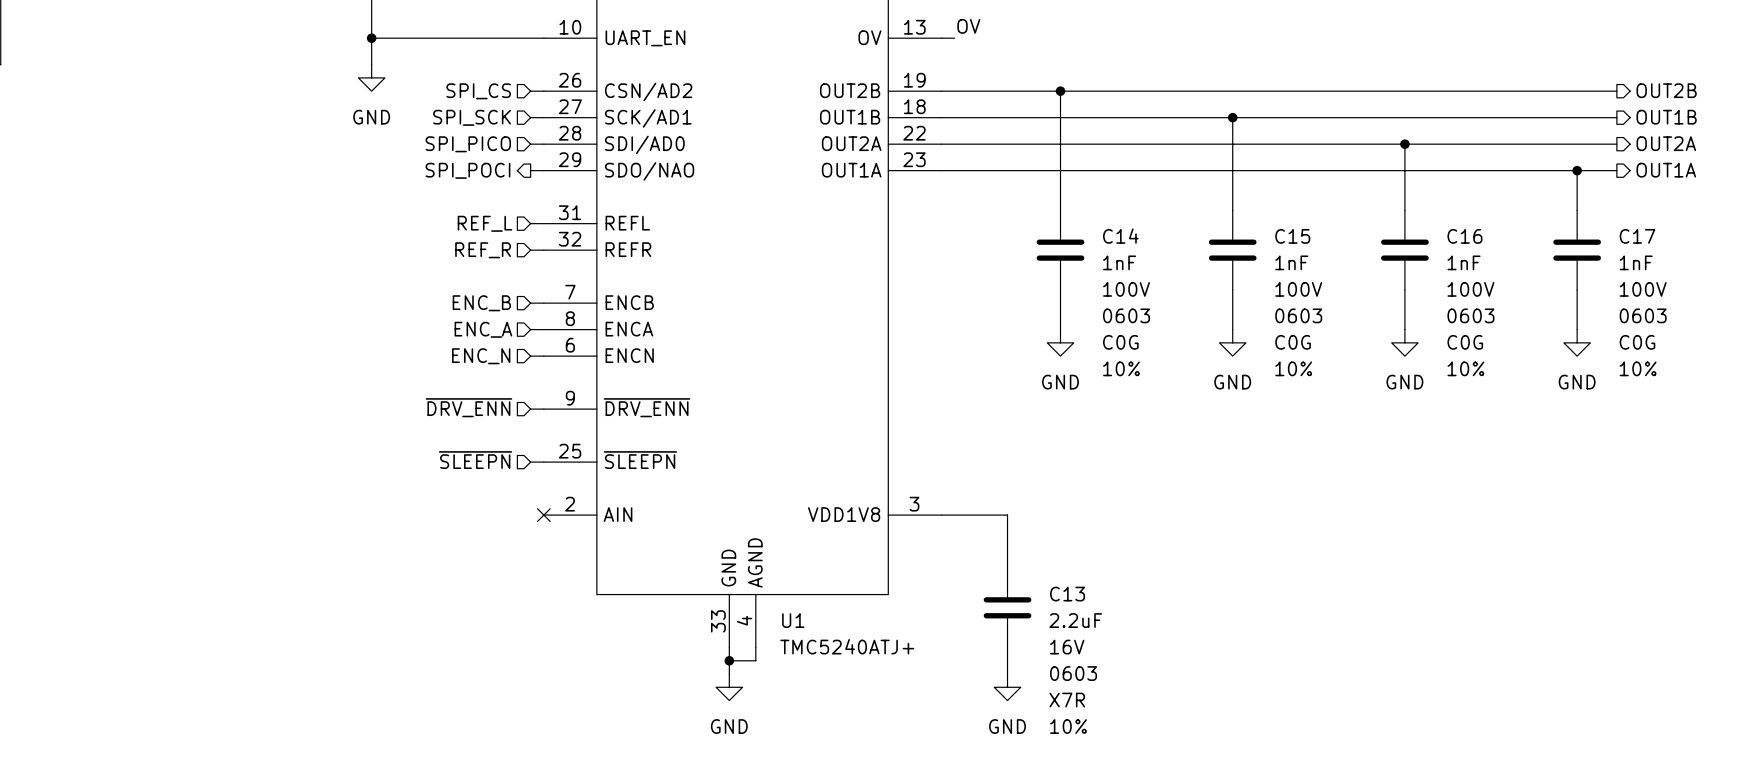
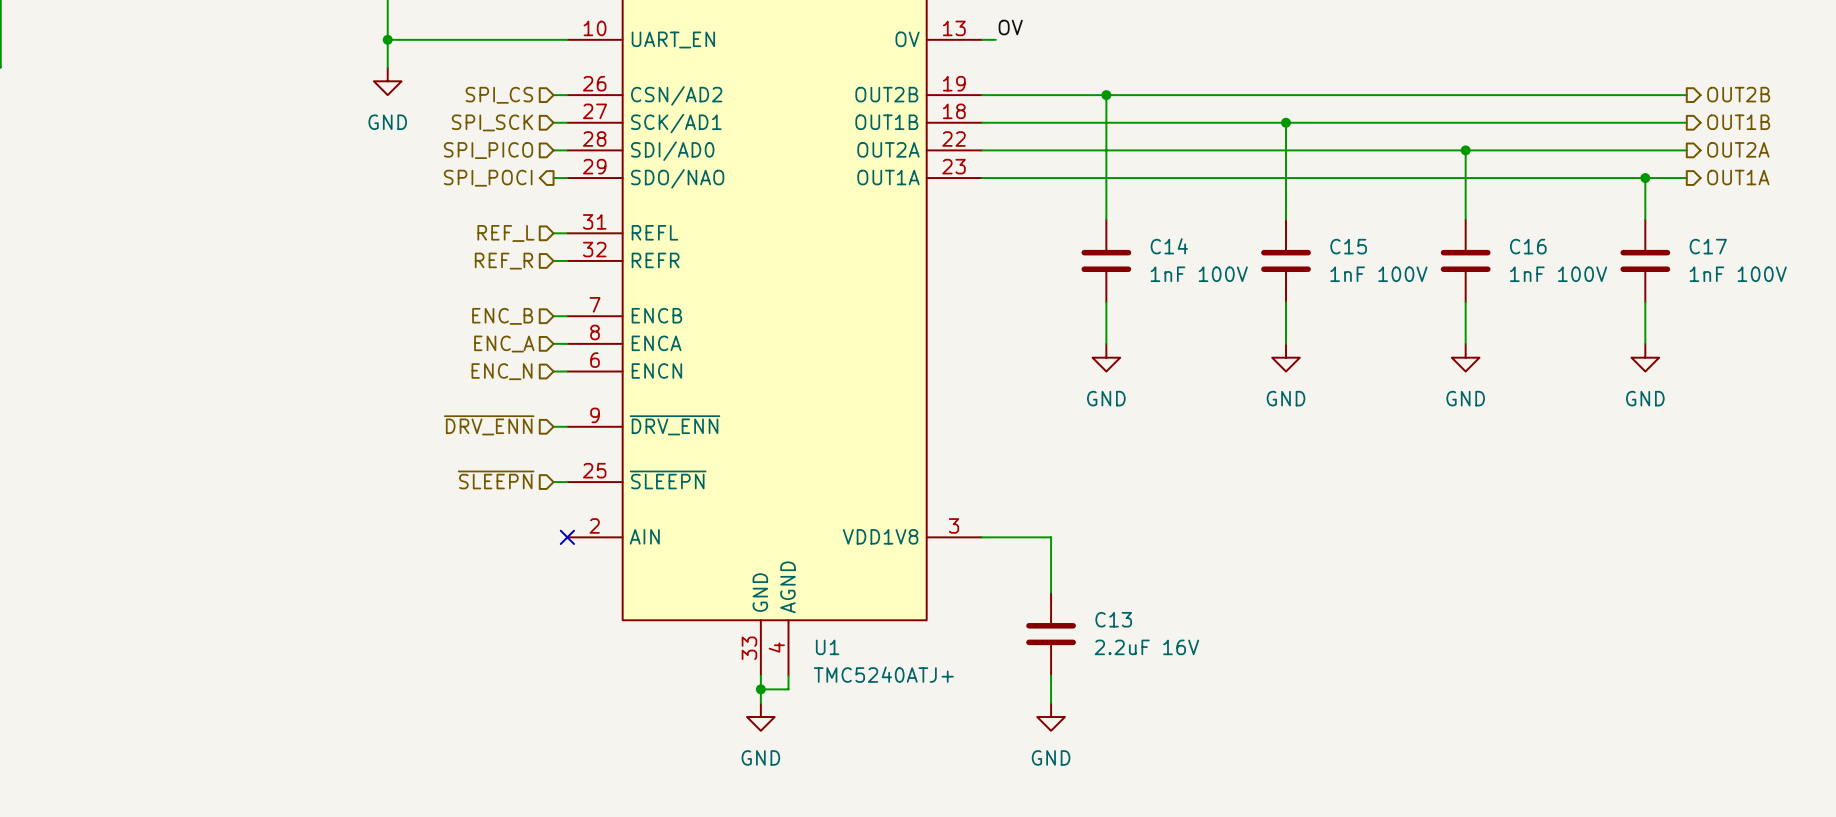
C14 value: 1nF (1119, 262) -> 1nF 100V (1199, 274)
C15 value: 1nF (1291, 262) -> 1nF 100V (1378, 274)
C16 value: 1nF (1464, 262) -> 1nF 100V (1558, 274)
C17 value: 1nF (1636, 262) -> 1nF 100V (1738, 274)
C14 text: 100V (1126, 289) -> none
C15 text: 100V (1298, 289) -> none
C16 text: 100V (1470, 289) -> none
C17 text: 100V (1643, 289) -> none
C14 text: 0603 (1126, 315) -> none
C15 text: 0603 (1298, 315) -> none
C16 text: 0603 (1470, 315) -> none
C17 text: 0603 (1643, 315) -> none
C14 text: C0G (1120, 342) -> none
C15 text: C0G (1293, 342) -> none
C16 text: C0G (1465, 342) -> none
C17 text: C0G (1637, 342) -> none
C14 text: 10% (1121, 368) -> none
C15 text: 10% (1293, 368) -> none
C16 text: 10% (1465, 368) -> none
C17 text: 10% (1638, 368) -> none
C13 value: 2.2uF (1075, 620) -> 2.2uF 16V (1146, 647)
C13 text: 16V (1067, 647) -> none
C13 text: 0603 (1073, 673) -> none
C13 text: X7R (1067, 700) -> none
C13 text: 10% (1068, 726) -> none

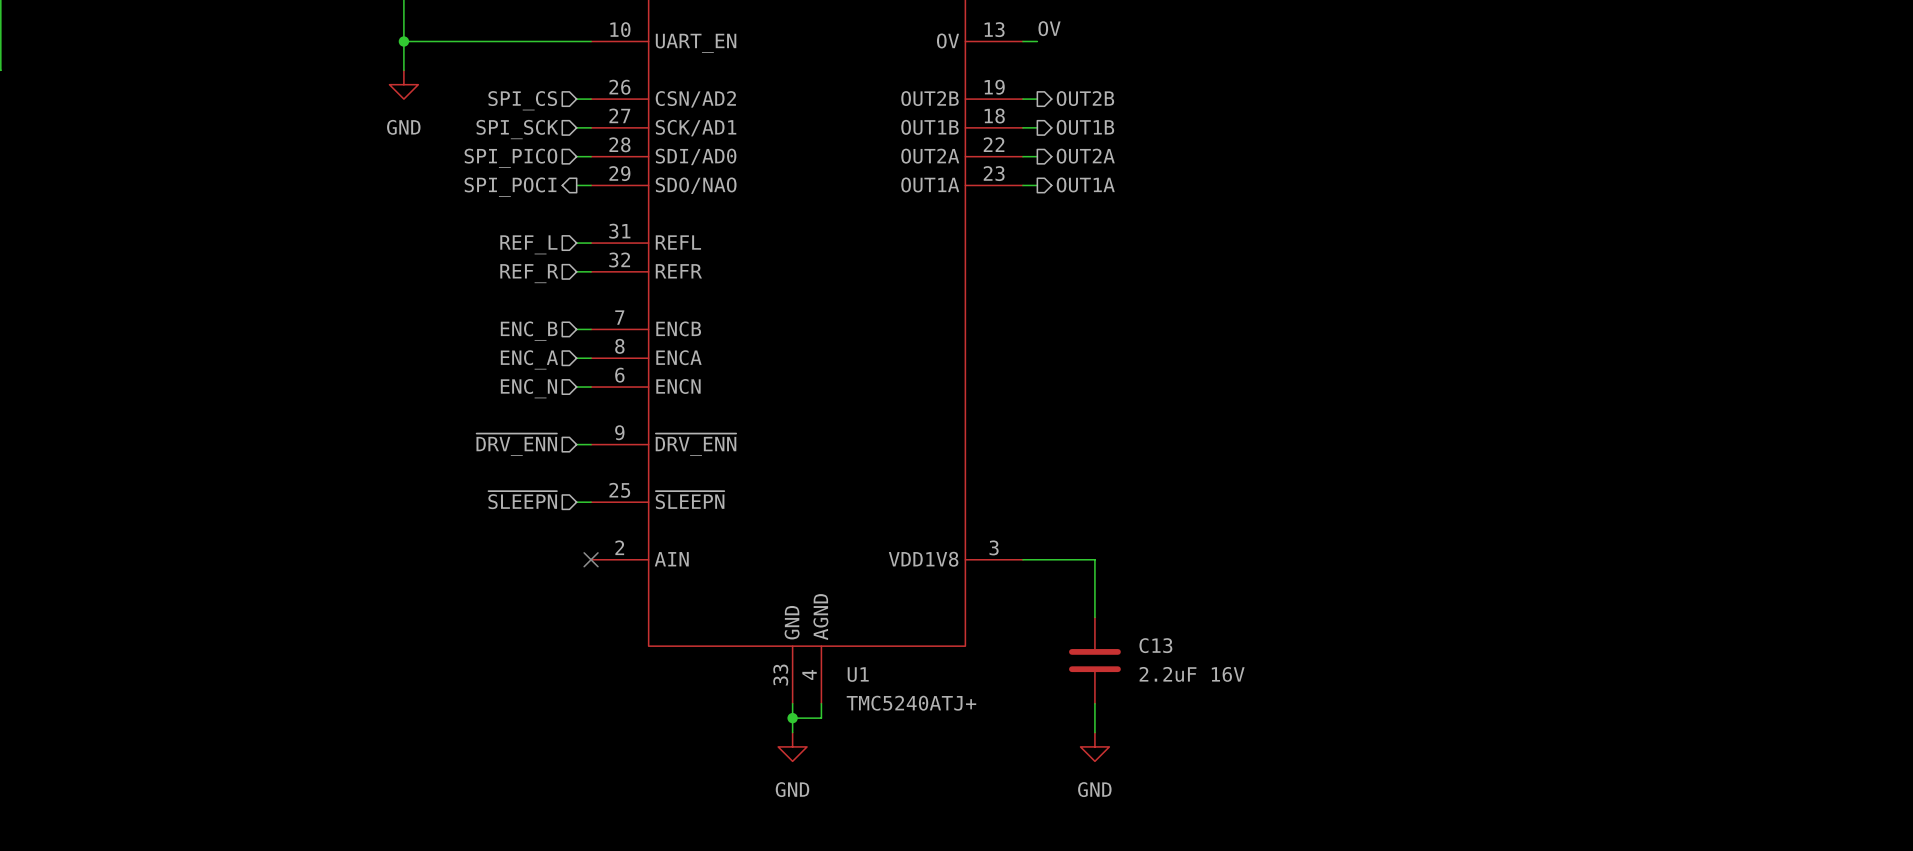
hierarchical label: none -> OUT2B (1085, 98)
hierarchical label: OUT2B (1738, 94) -> none
wire: (995, 95) (1686, 95) -> none
wire: (1106, 95) (1106, 219) -> none
junction: (1106, 95) -> none
wire: (995, 122) (1686, 122) -> none
hierarchical label: none -> OUT1B (1085, 127)
wire: (1286, 122) (1286, 219) -> none
junction: (1286, 122) -> none
hierarchical label: OUT1B (1738, 122) -> none
hierarchical label: none -> OUT2A (1085, 156)
hierarchical label: OUT2A (1738, 149) -> none
wire: (995, 150) (1686, 150) -> none
wire: (1465, 150) (1465, 219) -> none
junction: (1465, 150) -> none
hierarchical label: none -> OUT1A (1085, 184)
hierarchical label: OUT1A (1738, 177) -> none
wire: (995, 178) (1686, 178) -> none
wire: (1645, 178) (1645, 219) -> none
junction: (1645, 178) -> none
C14: 1nF 100V (1106, 260) -> none
C15: 1nF 100V (1286, 260) -> none
C16: 1nF 100V (1465, 260) -> none
C17: 1nF 100V (1645, 260) -> none
wire: (1106, 302) (1106, 343) -> none
wire: (1286, 302) (1286, 343) -> none
wire: (1465, 302) (1465, 343) -> none
wire: (1645, 302) (1645, 343) -> none
power symbol: GND (1106, 357) -> none
power symbol: GND (1286, 357) -> none
power symbol: GND (1465, 357) -> none
power symbol: GND (1645, 357) -> none

